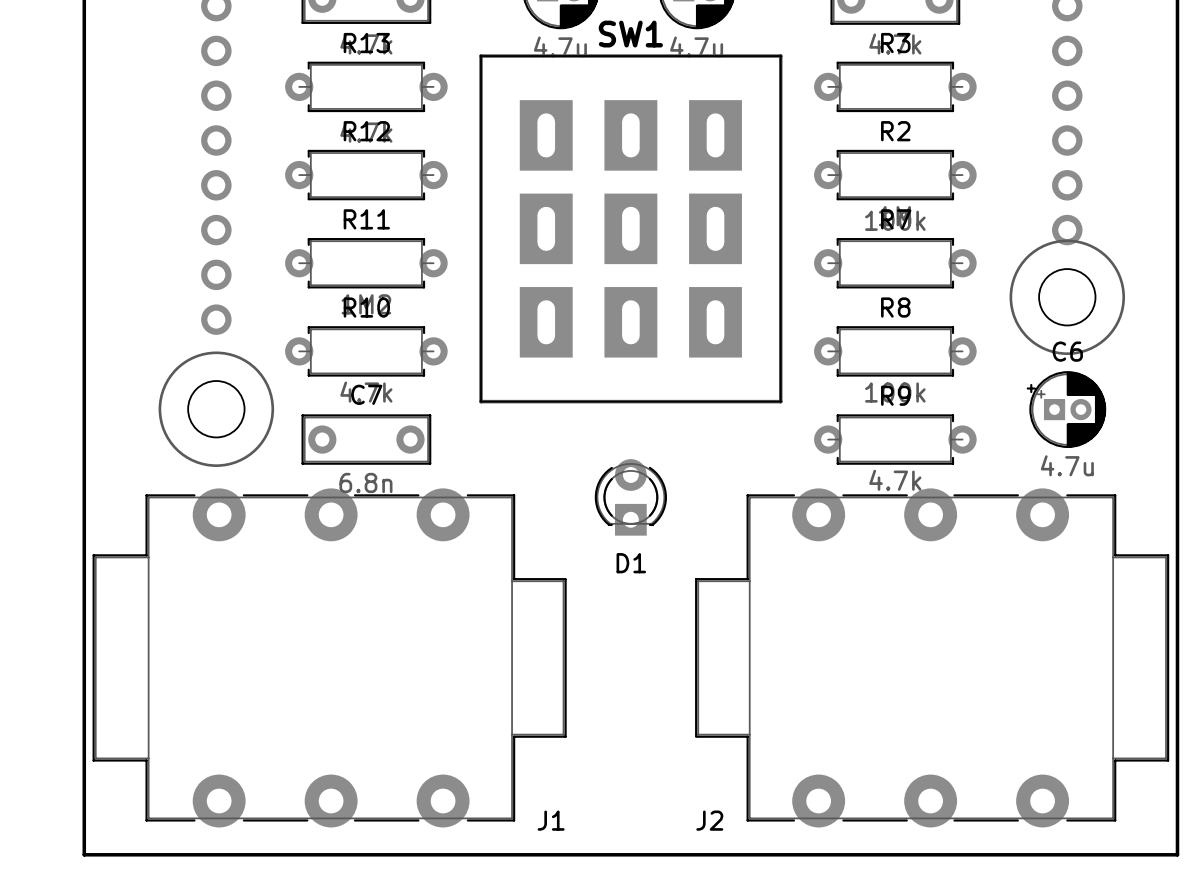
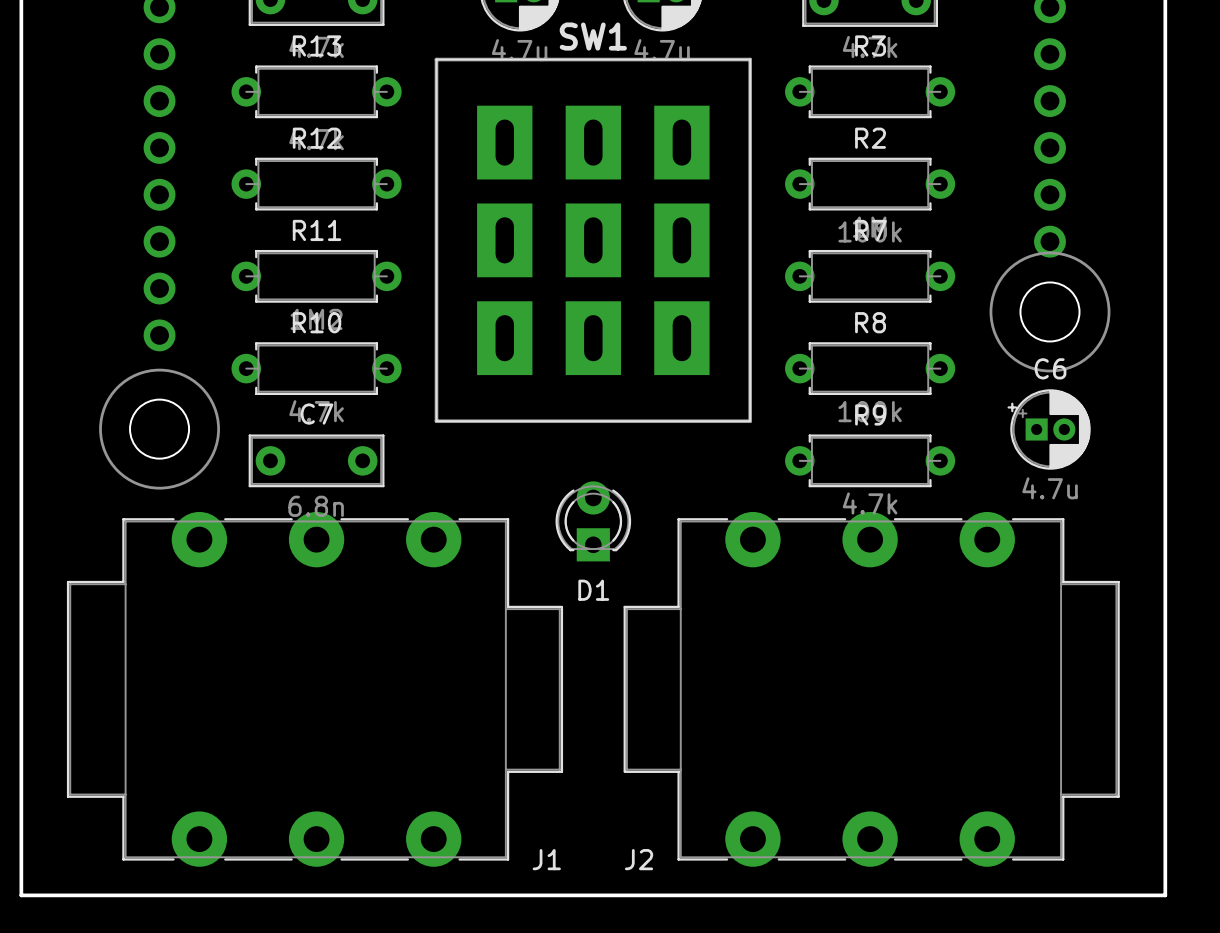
J1 position: (329, 657) -> (314, 689)
J2 position: (932, 657) -> (871, 689)

